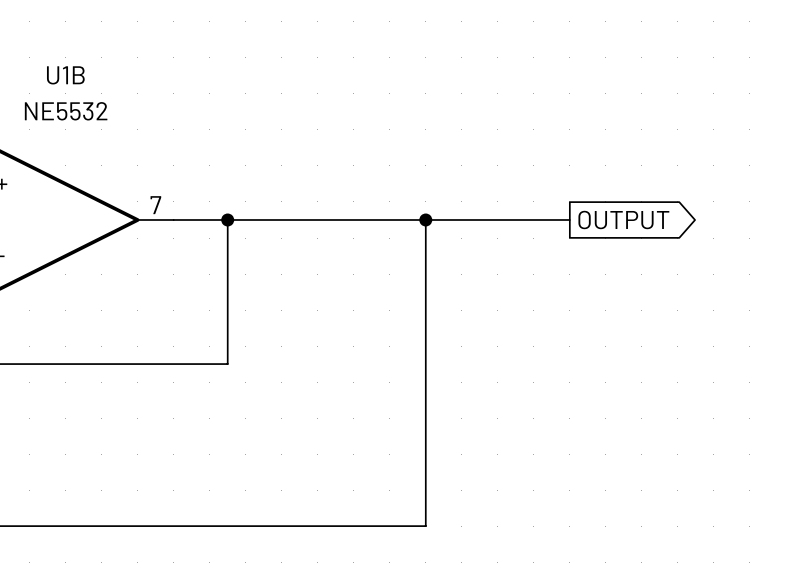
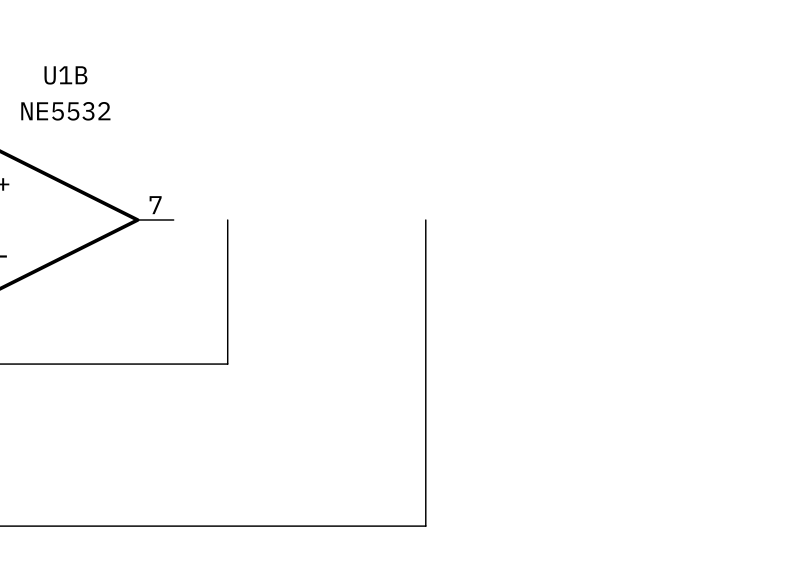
wire: (173, 220) (569, 220) -> none
junction: (227, 220) -> none
junction: (425, 220) -> none
global label: OUTPUT (623, 220) -> none

